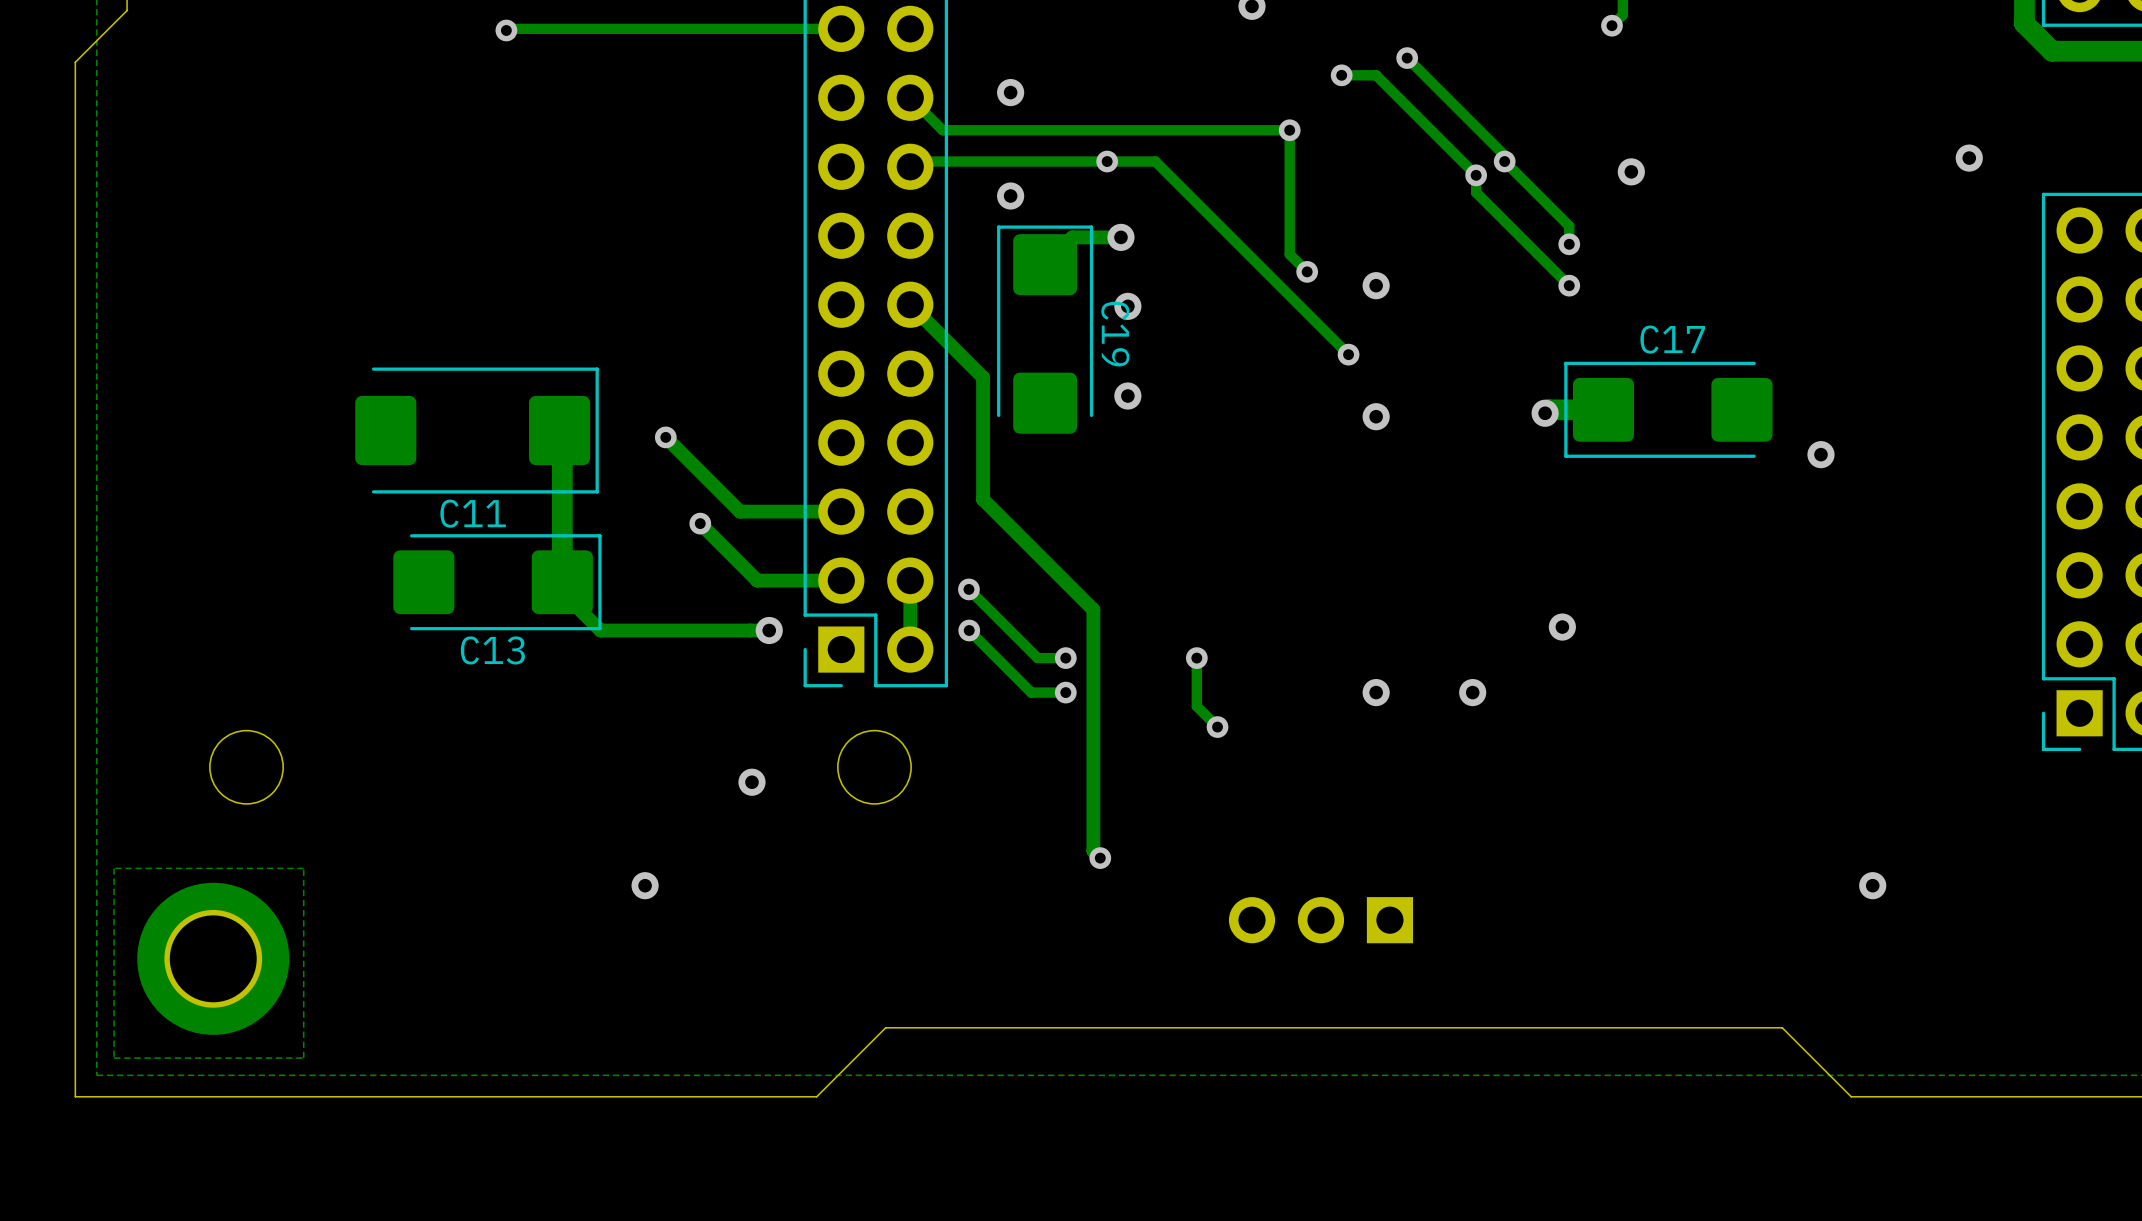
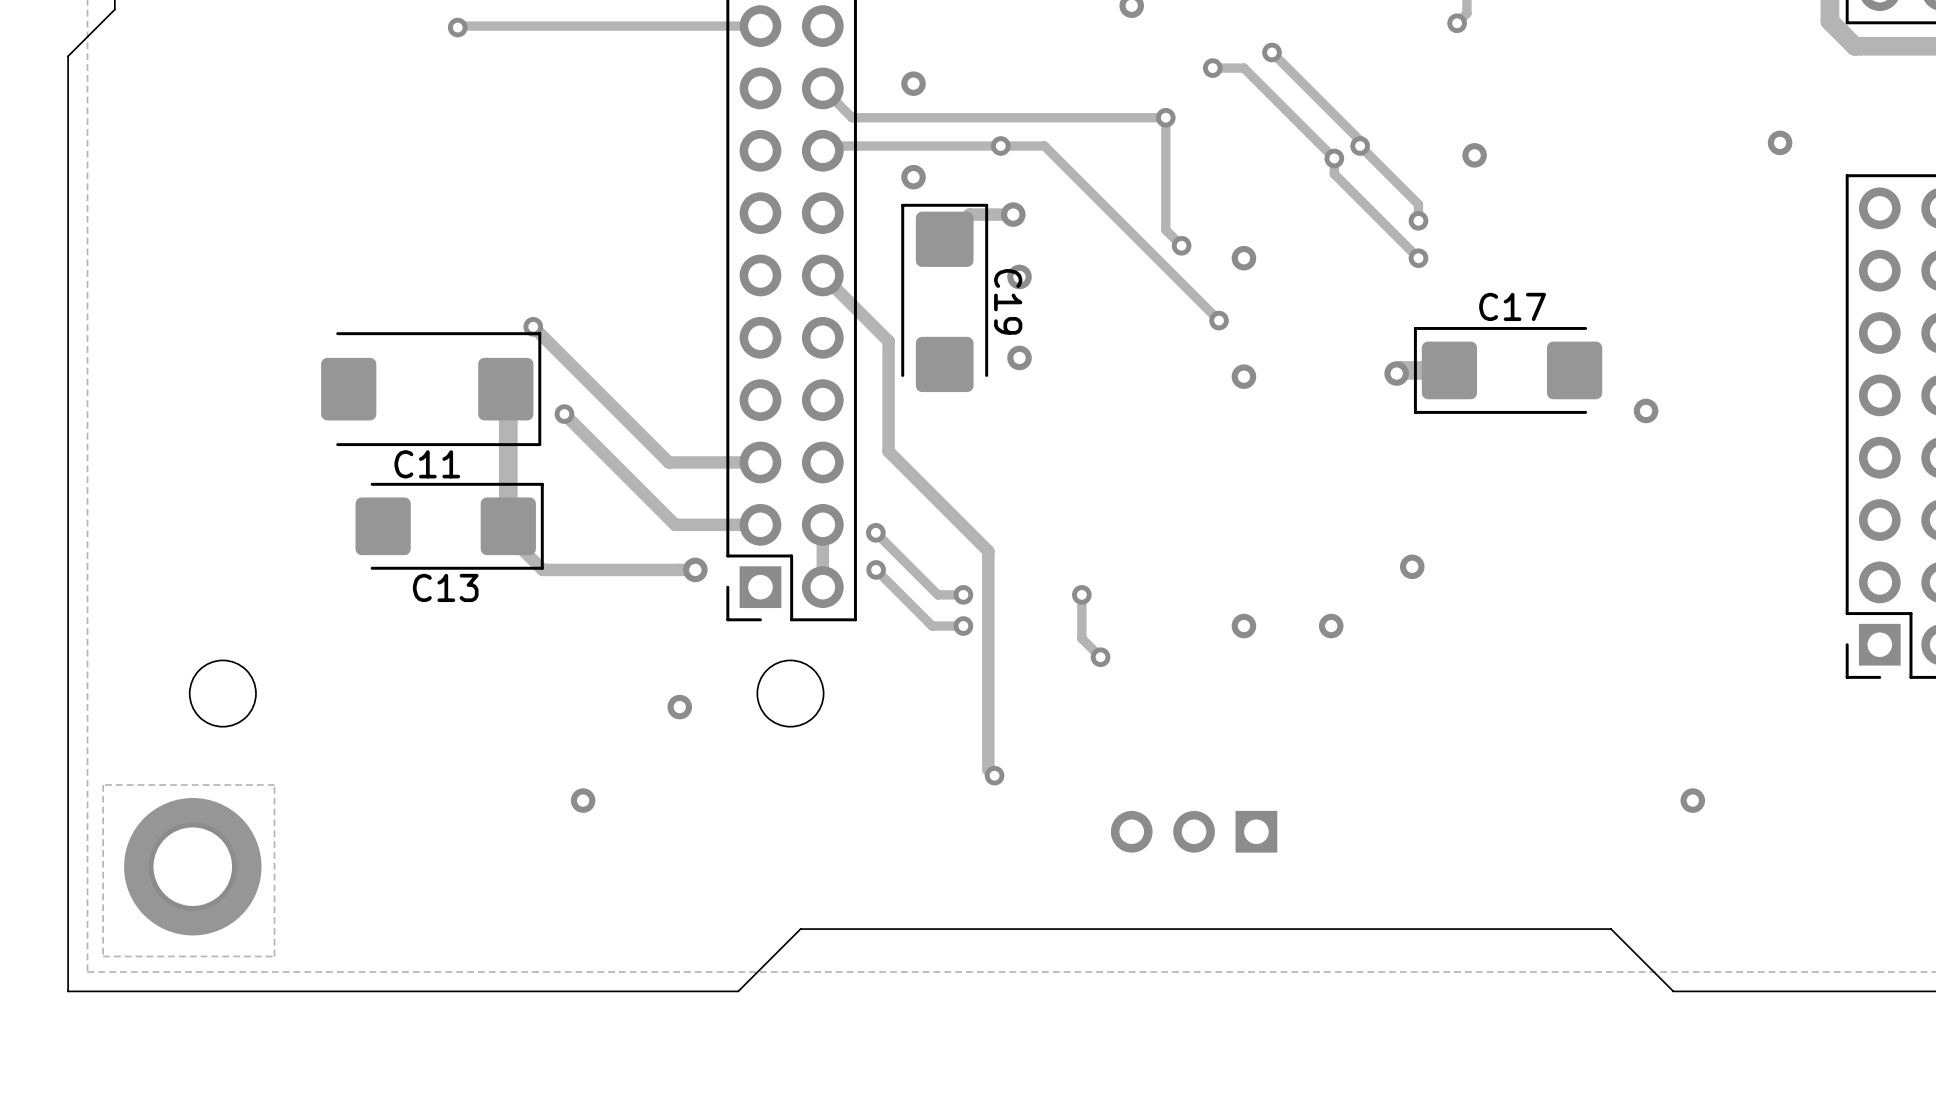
track: none -> (533, 326) (601, 395)
via: none -> (533, 326)
via position: (665, 437) -> (564, 414)
track: (700, 523) (757, 580) -> (564, 414) (675, 524) (684, 524)
via: (700, 523) -> none

